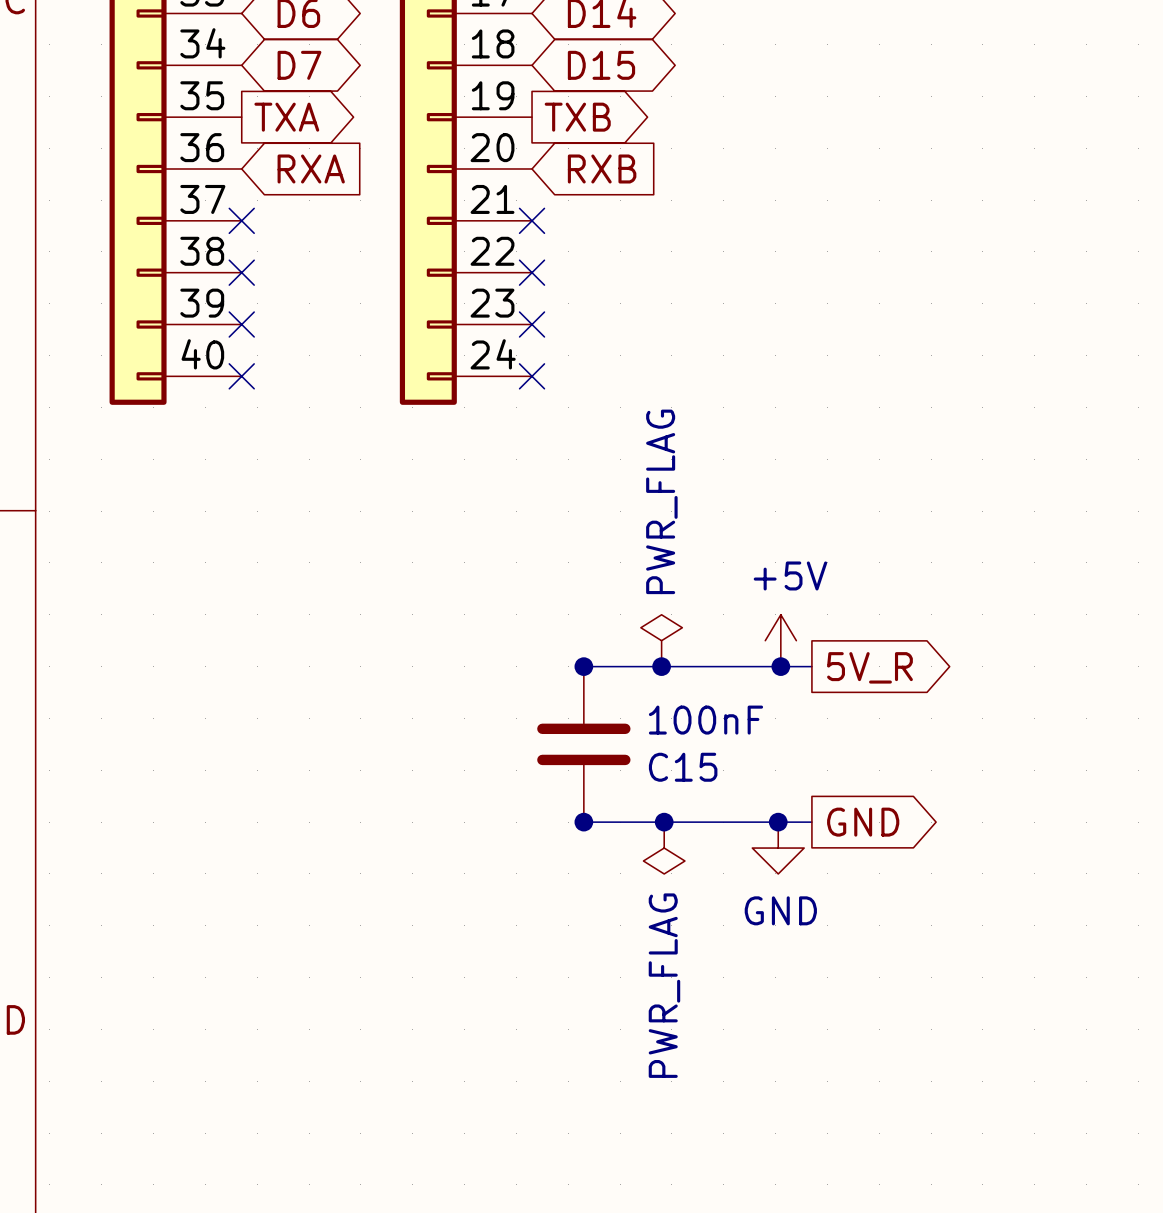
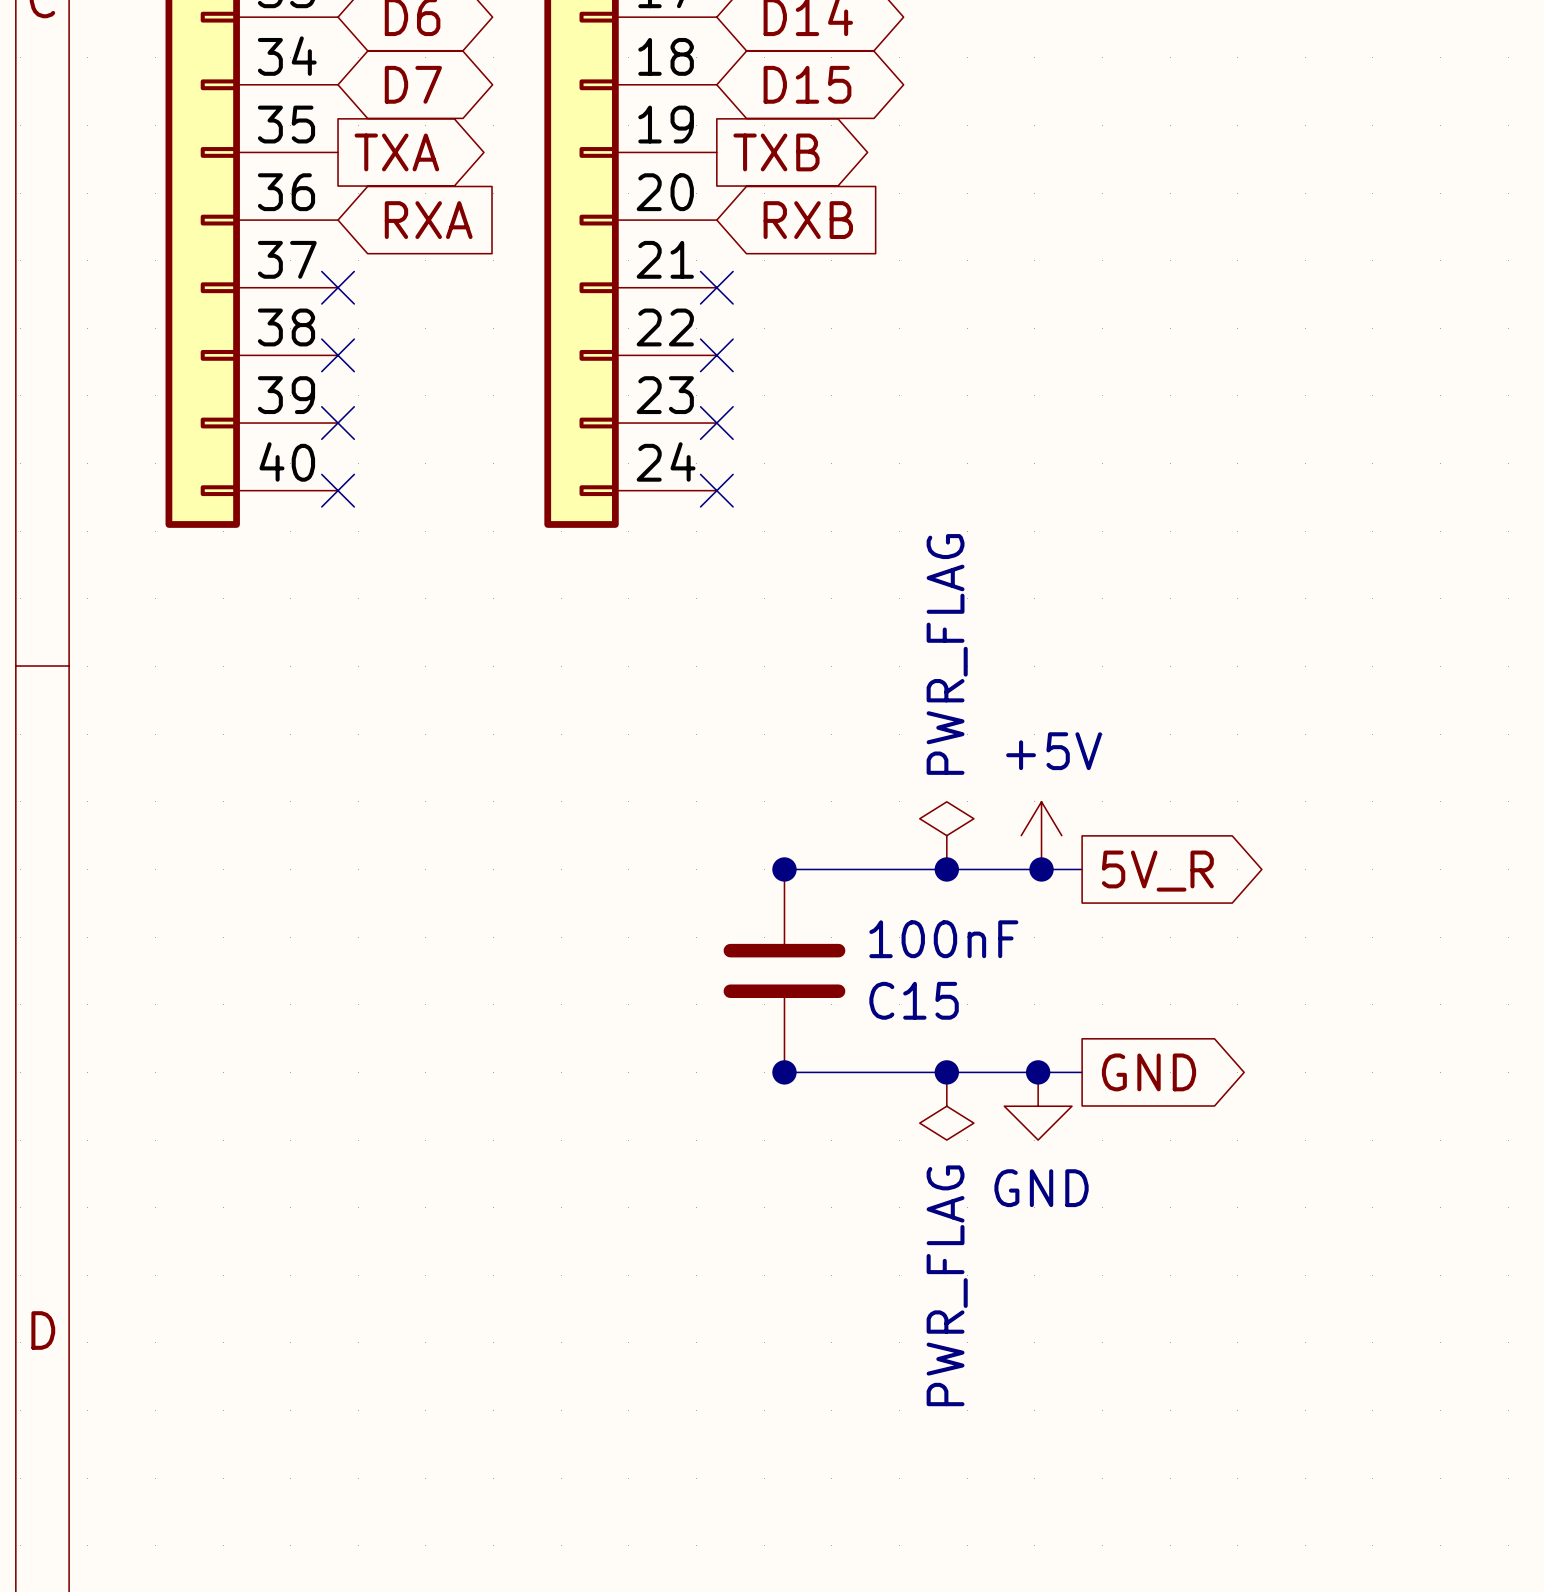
power symbol position: PWR_FLAG (661, 640) -> PWR_FLAG (946, 835)
junction position: (661, 666) -> (946, 869)
junction position: (664, 822) -> (946, 1072)
power symbol position: PWR_FLAG (664, 848) -> PWR_FLAG (946, 1106)

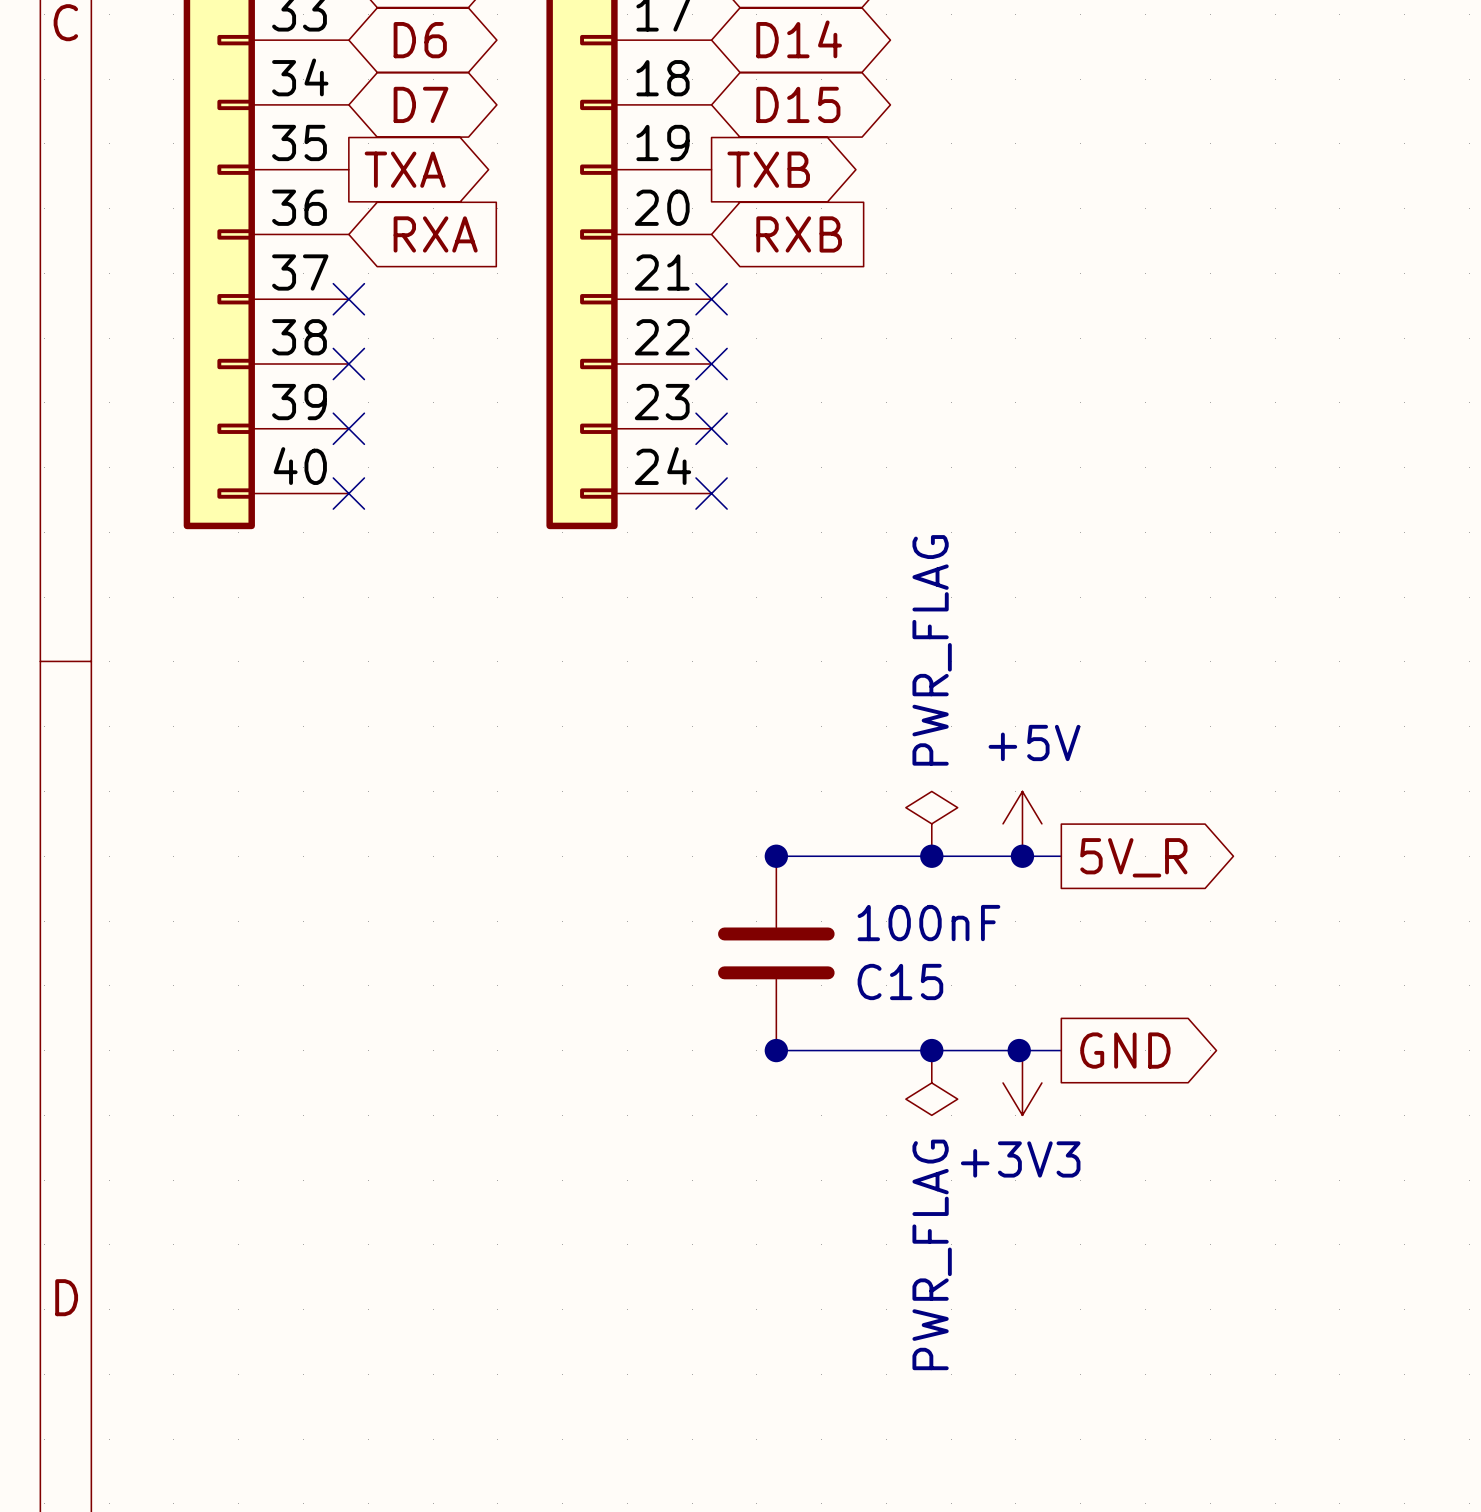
power symbol: GND (1038, 1106) -> +3V3 (1022, 1082)

